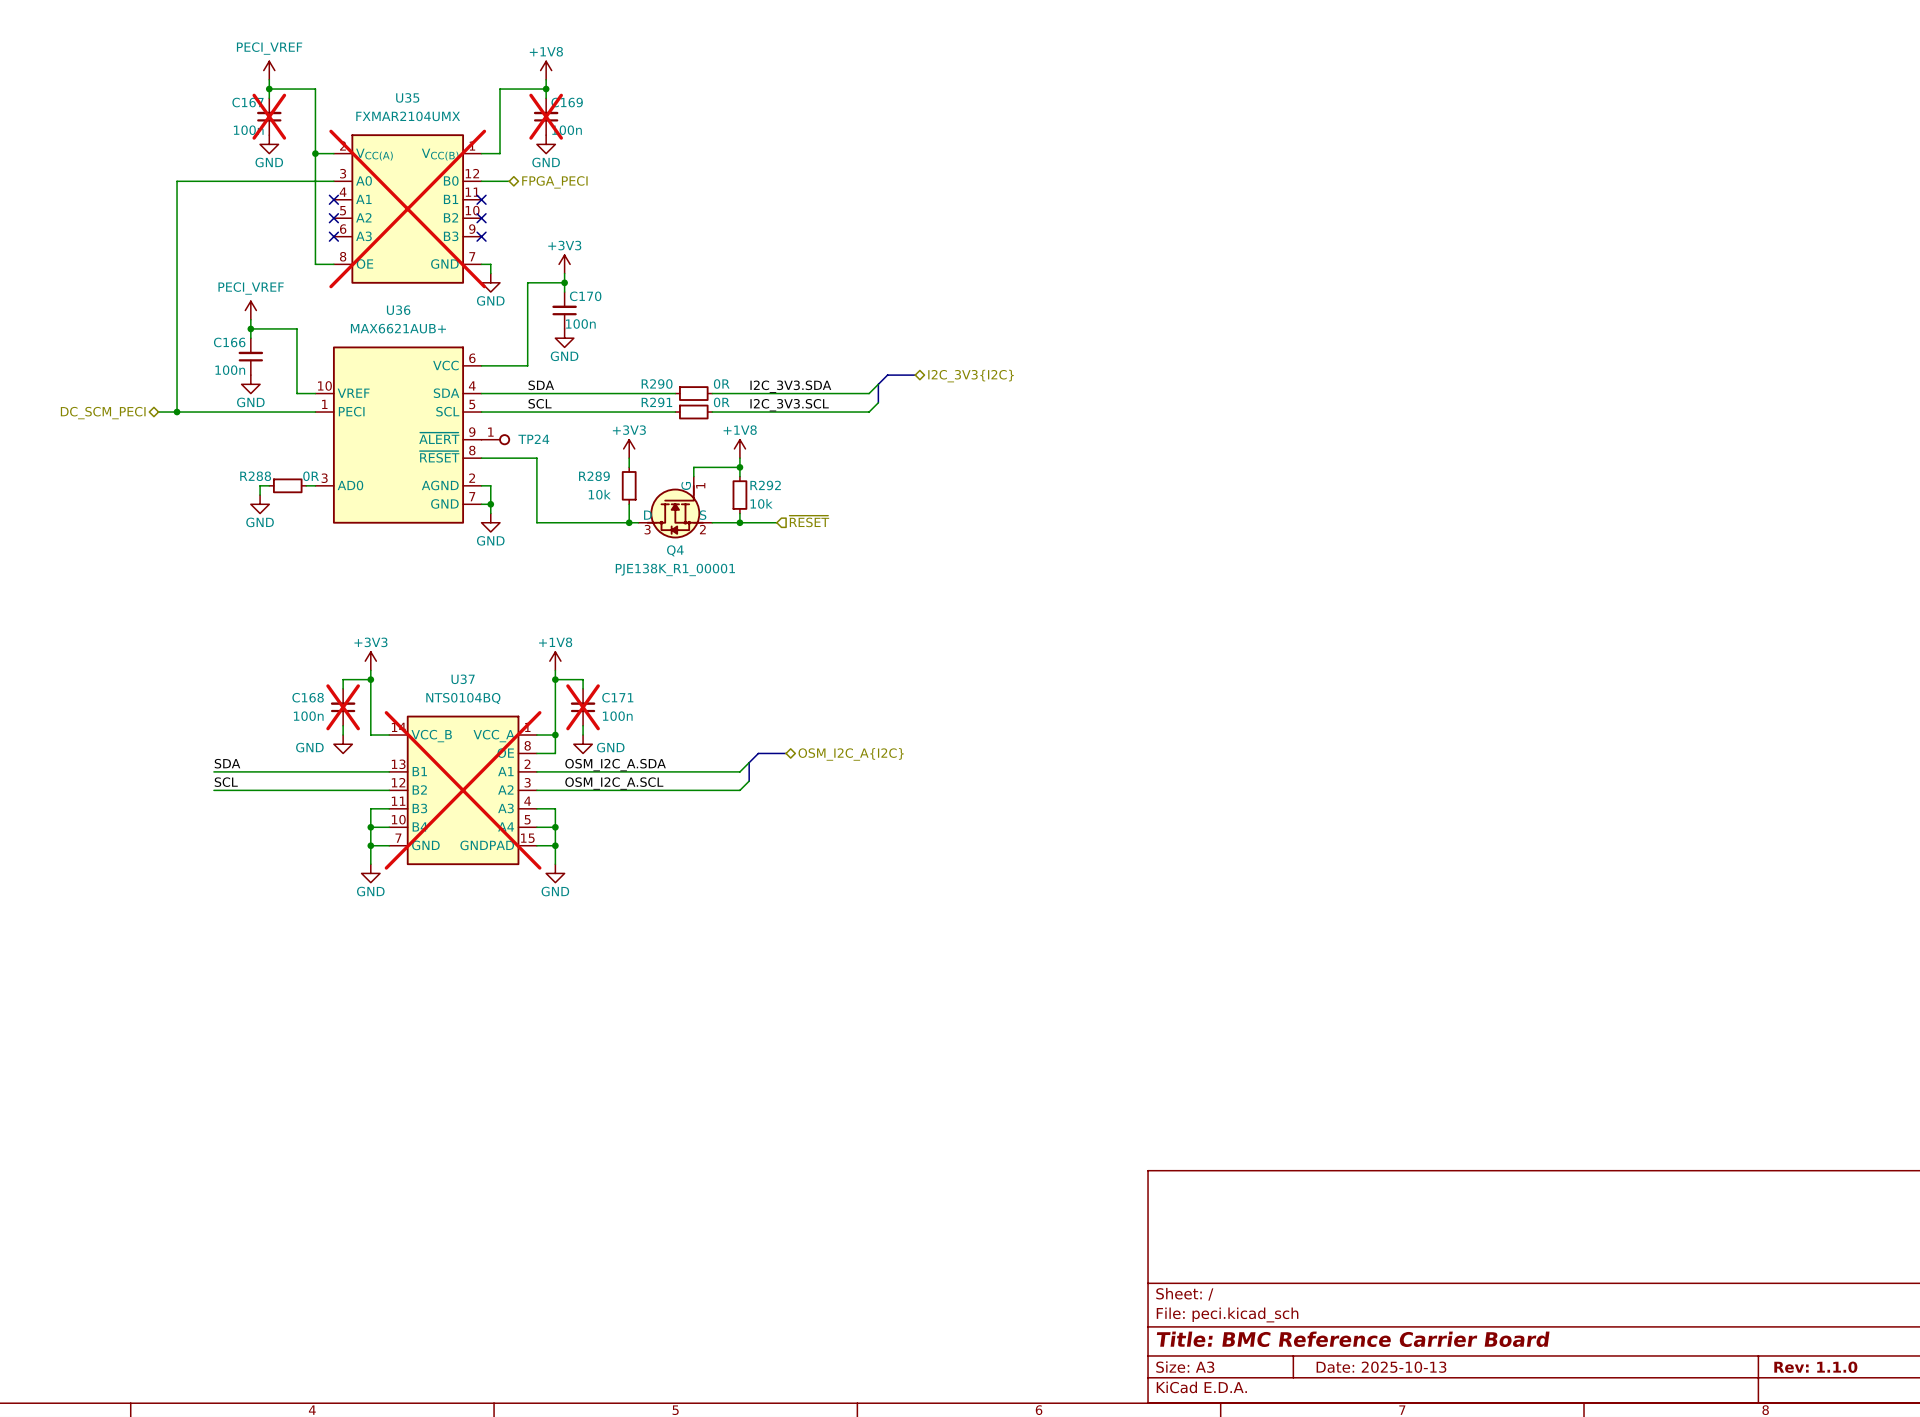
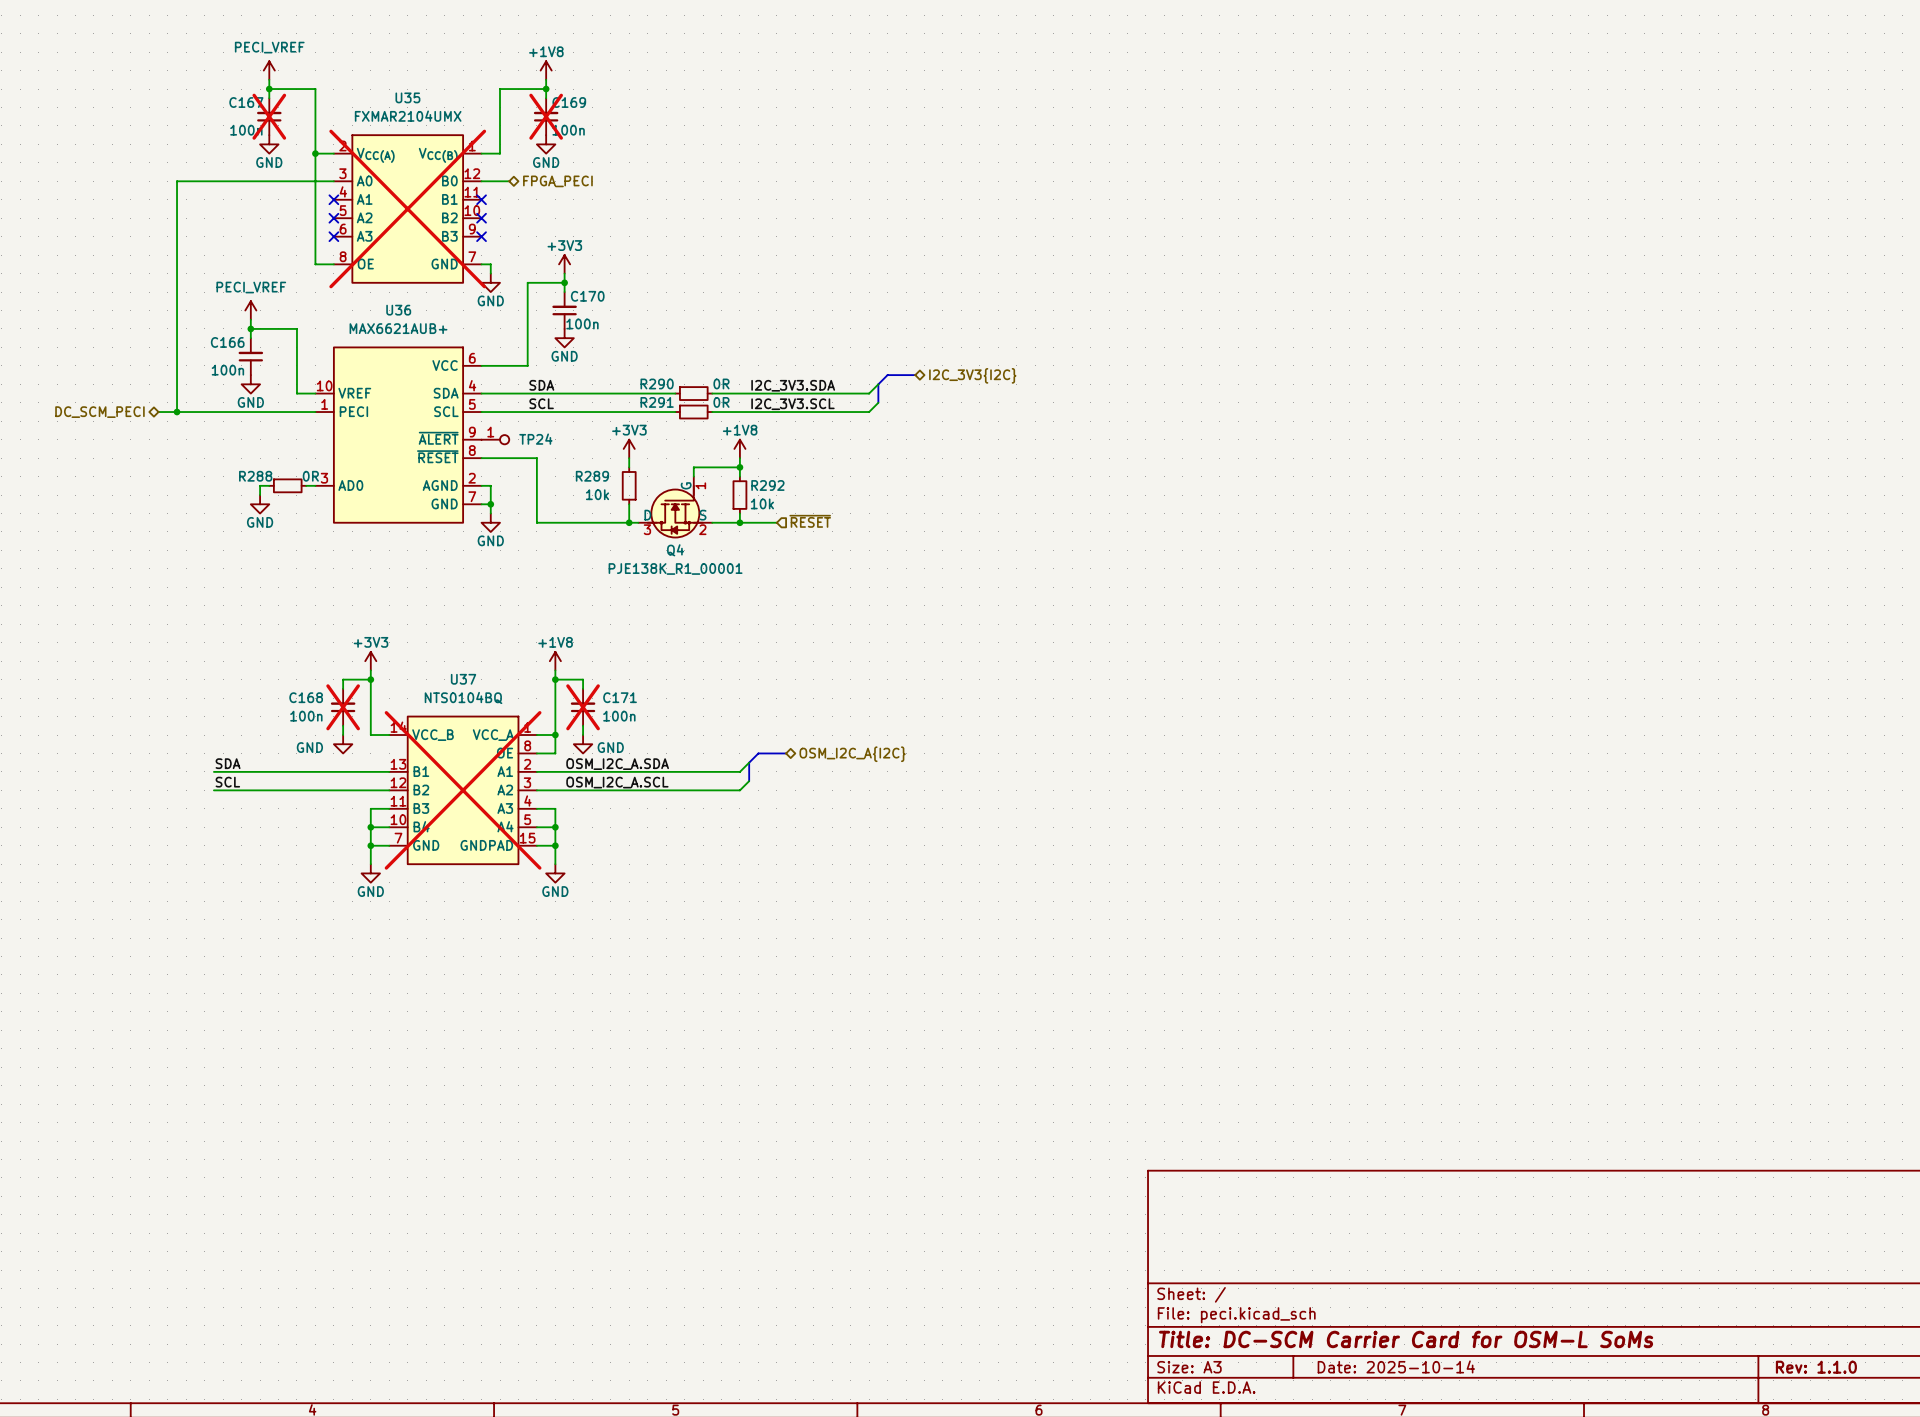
title block: Title: BMC Reference Carrier Board (1353, 1339) -> Title: DC-SCM Carrier Card for OSM-L SoMs (1406, 1339)
title block: Date: 2025-10-13 (1381, 1367) -> Date: 2025-10-14 (1396, 1366)

